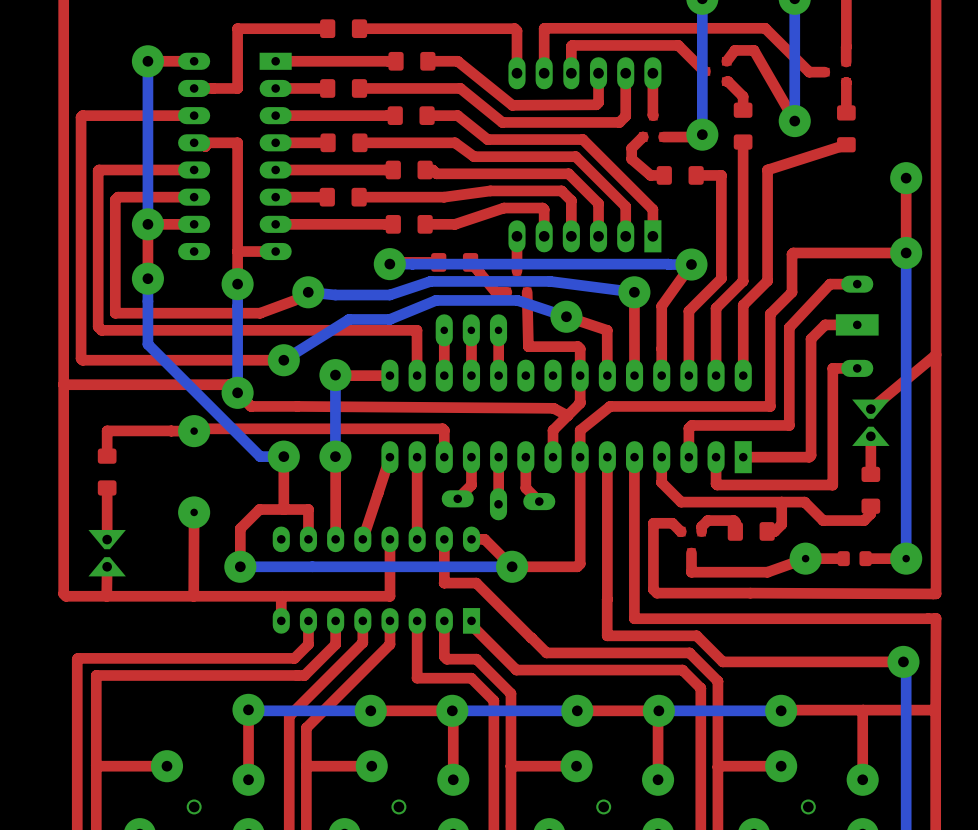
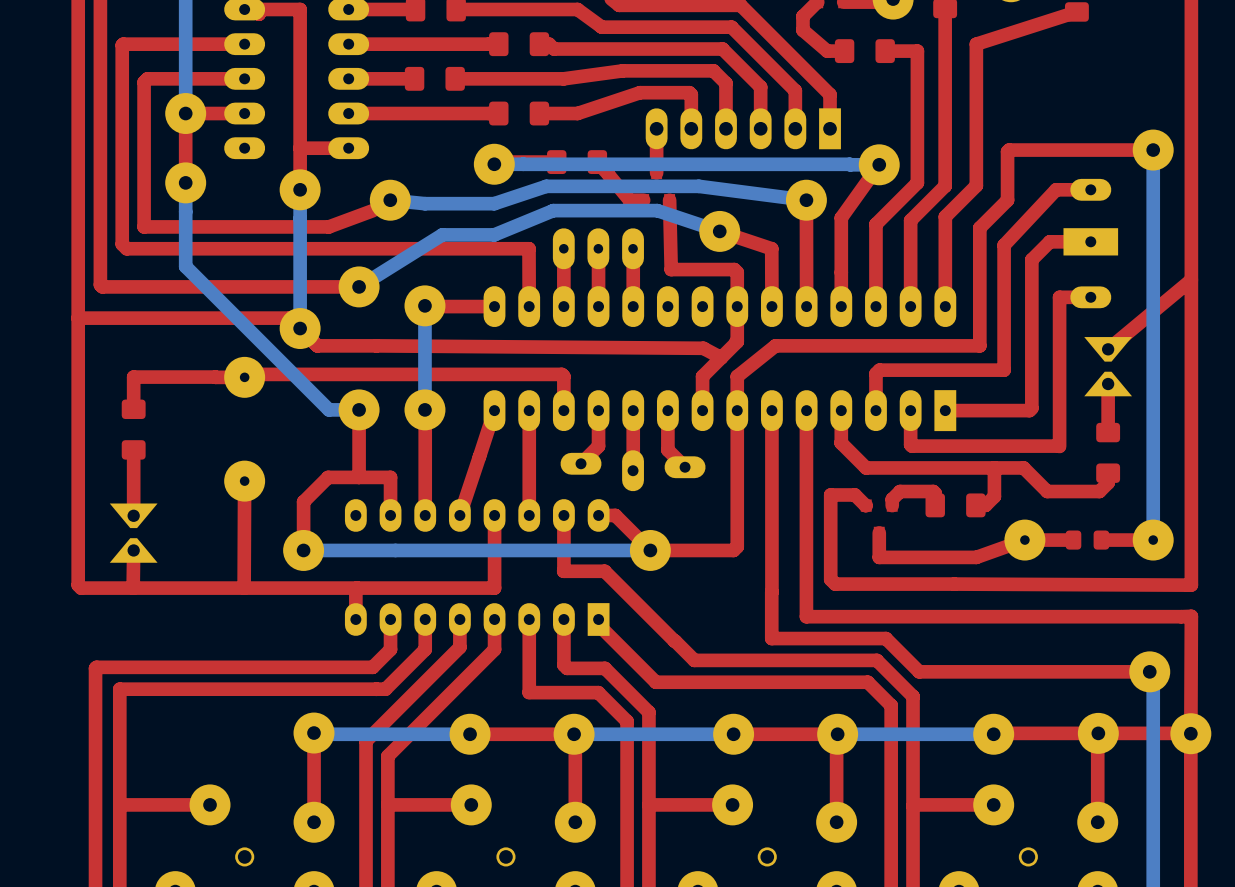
top track: (906, 178) (906, 252) -> none
part: (906, 178) -> none
part: none -> (1098, 733)
part: none -> (1190, 733)

